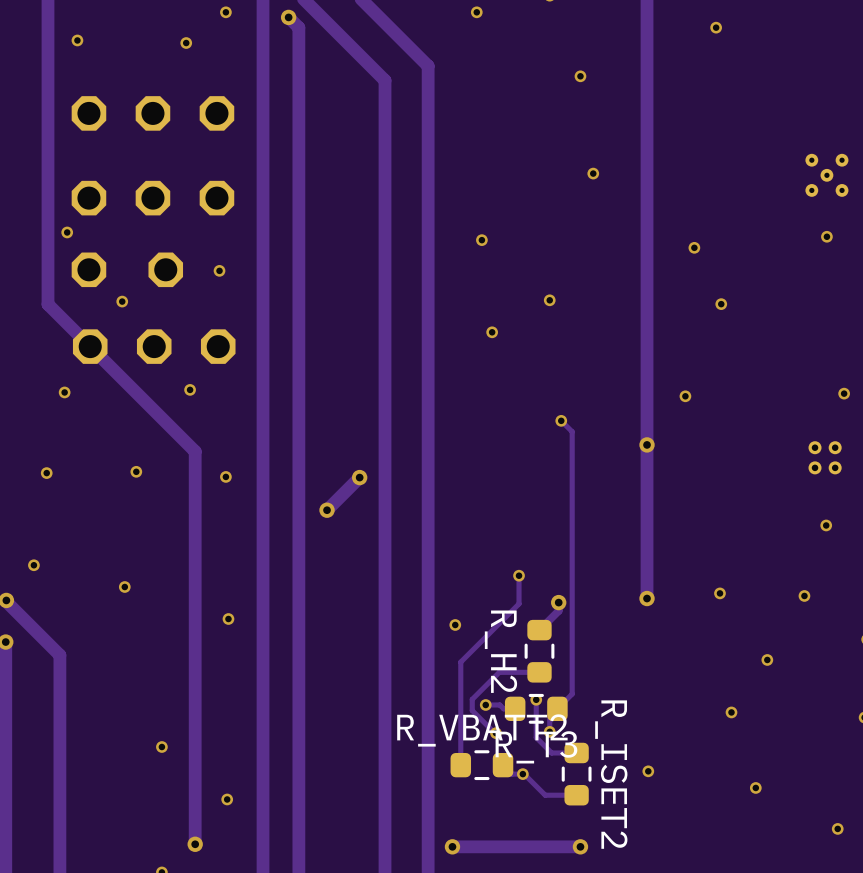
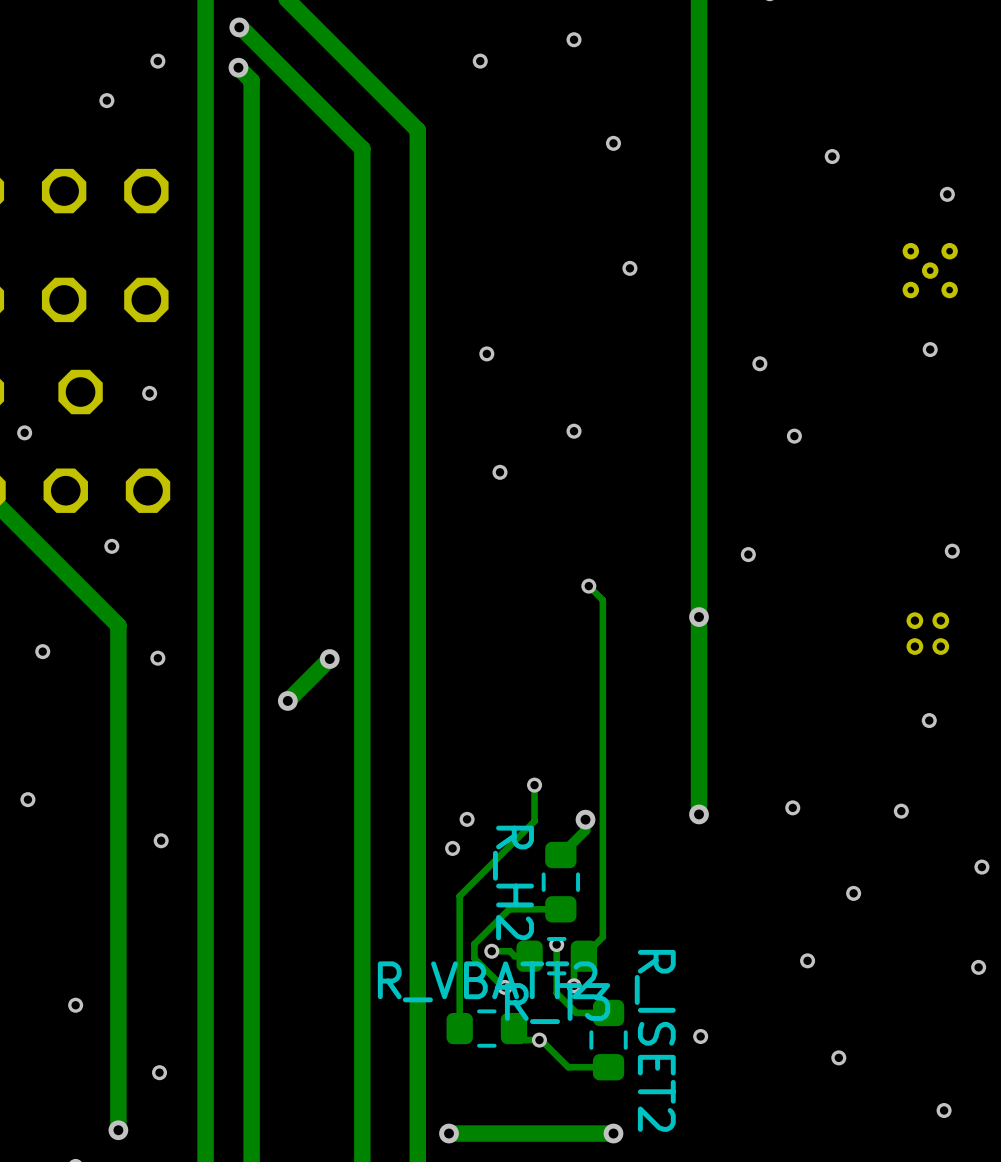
via position: (716, 27) -> (832, 156)
via: none -> (947, 194)
via: none -> (467, 819)

